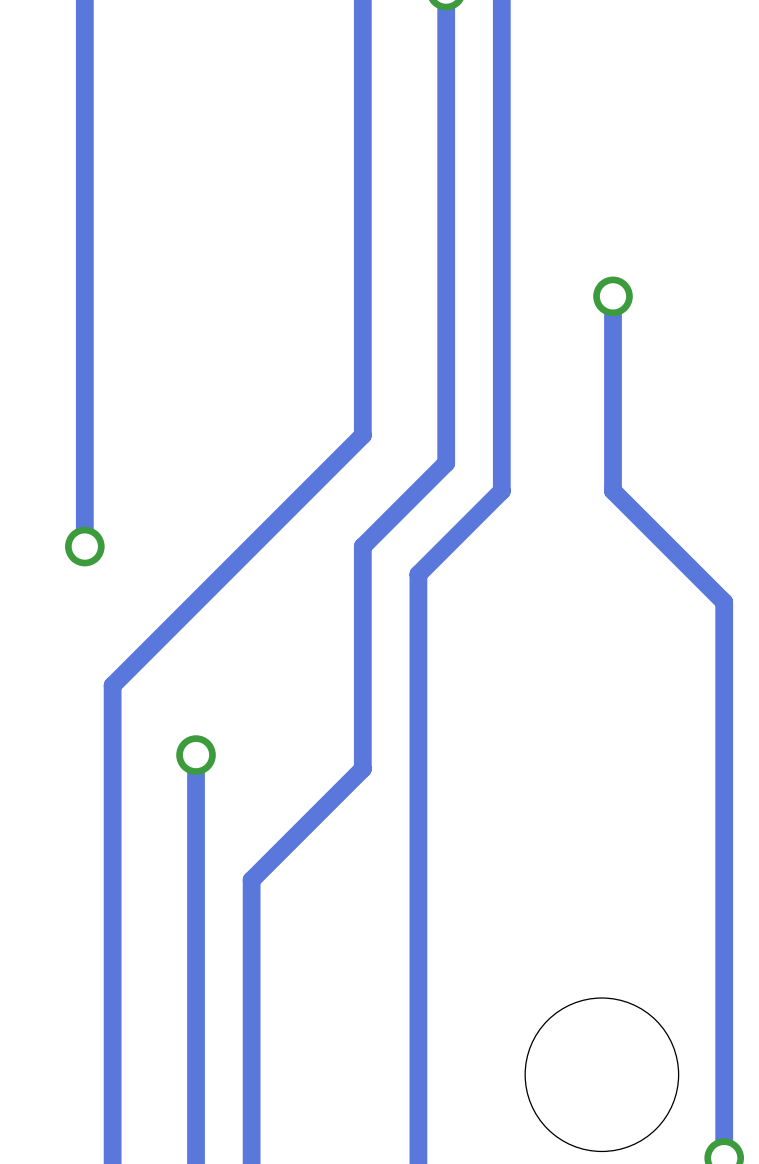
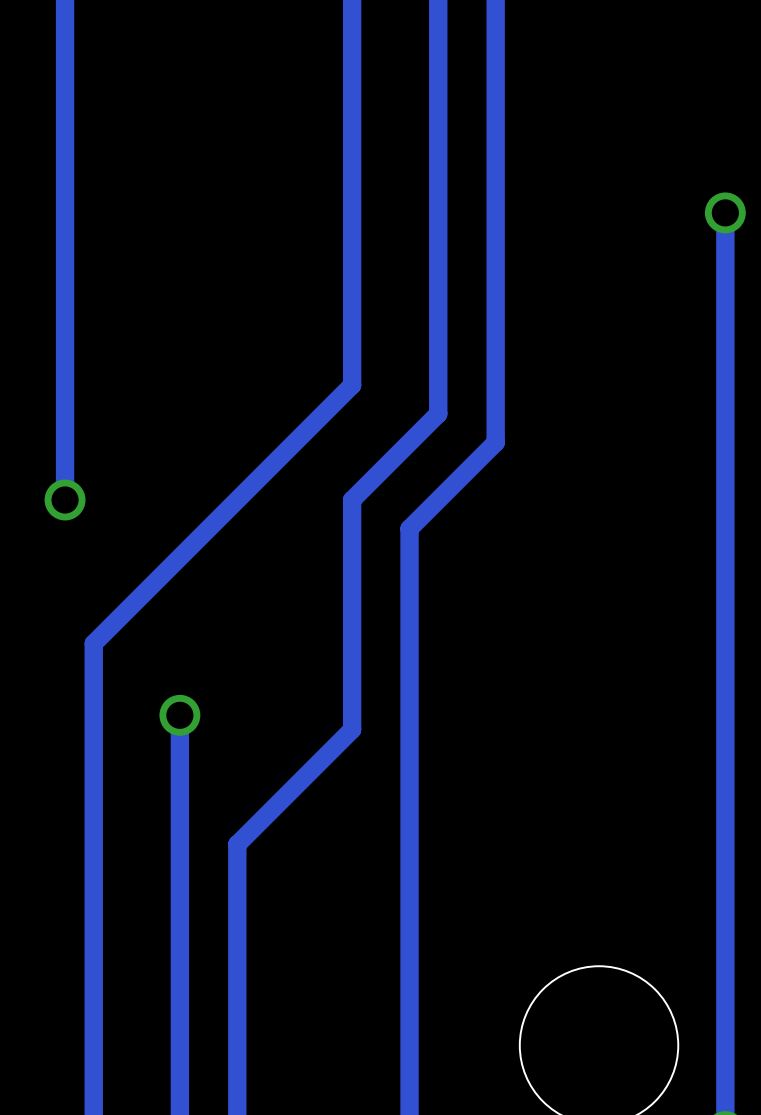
track: (613, 296) (613, 490) (724, 602) -> (725, 212) (725, 557)
via position: (613, 296) -> (725, 212)

